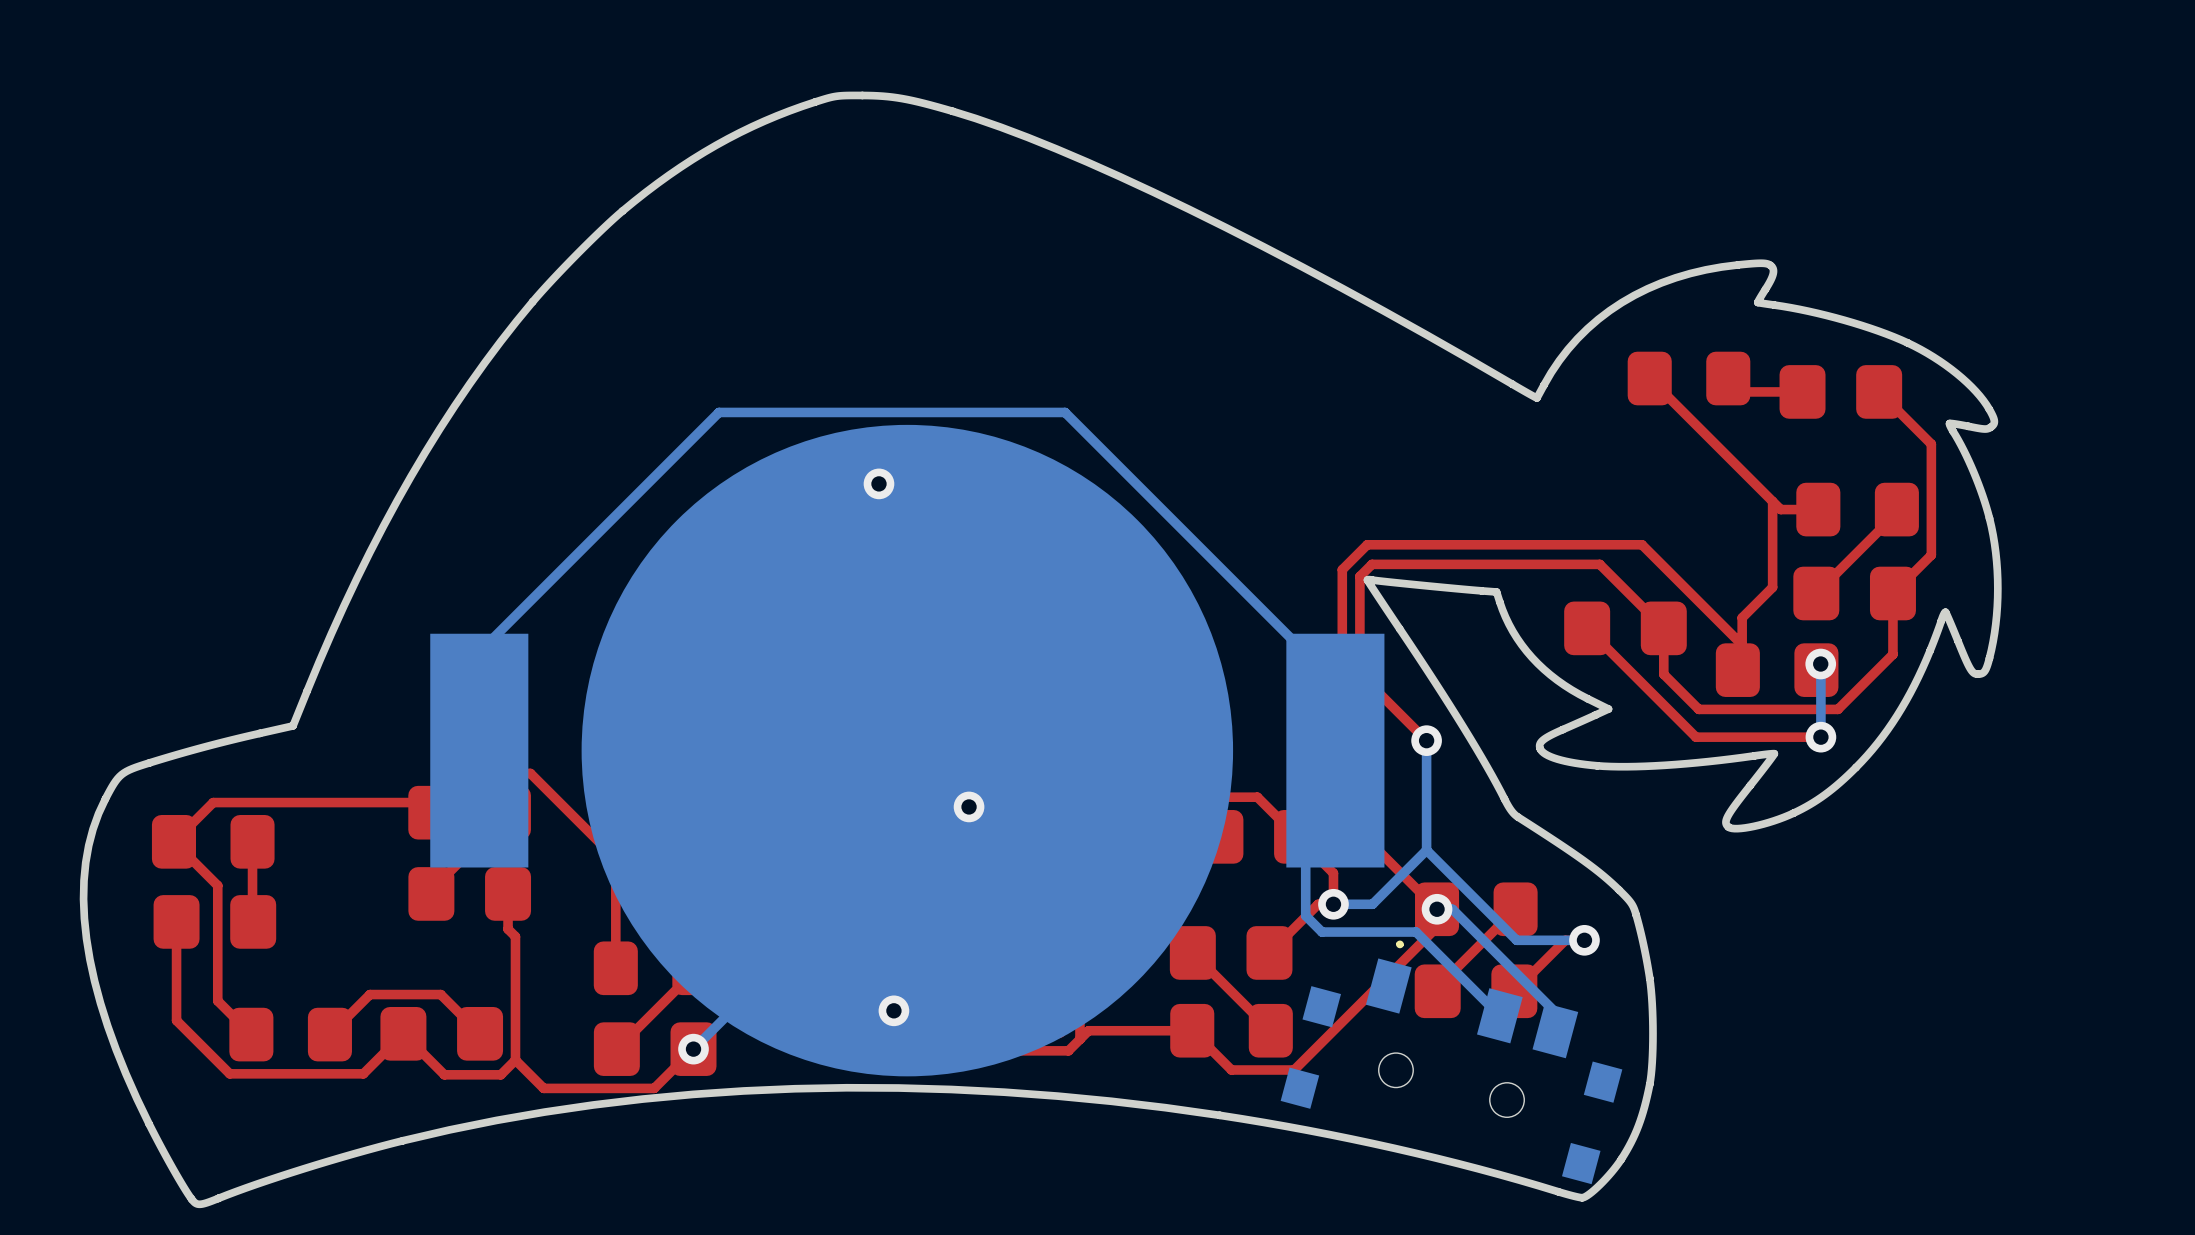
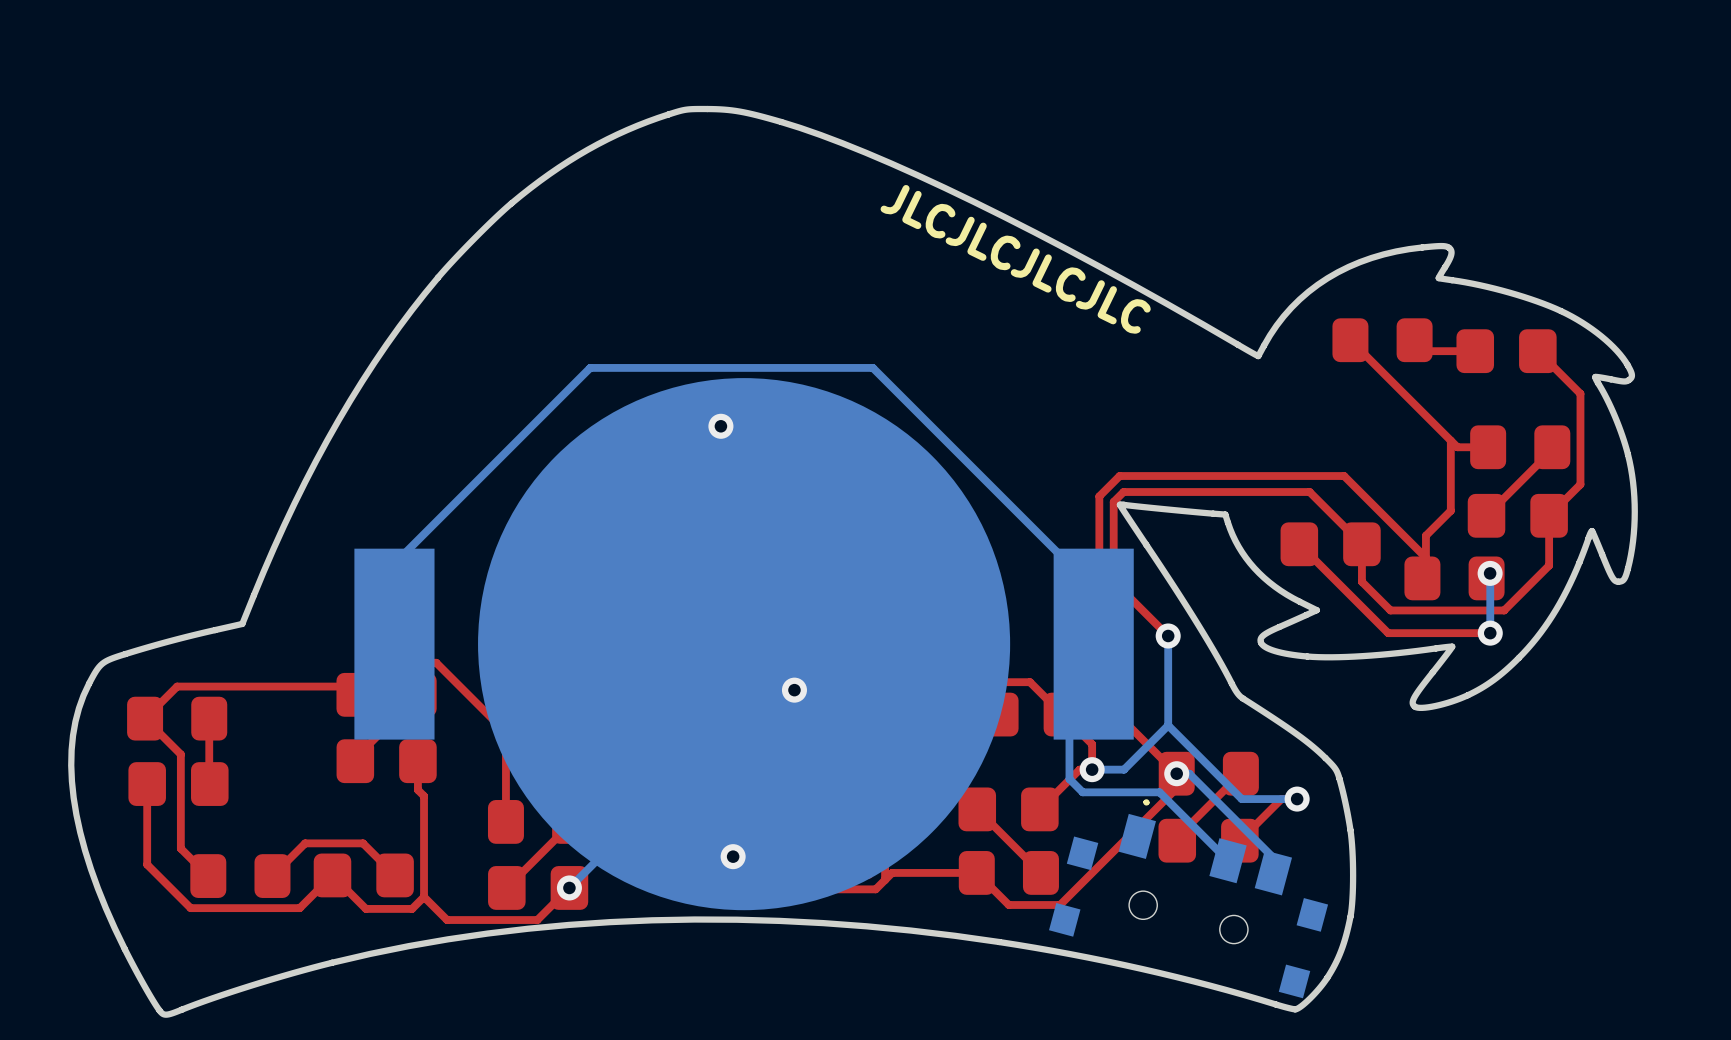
text: none -> JLCJLCJLCJLC (1015, 259)

